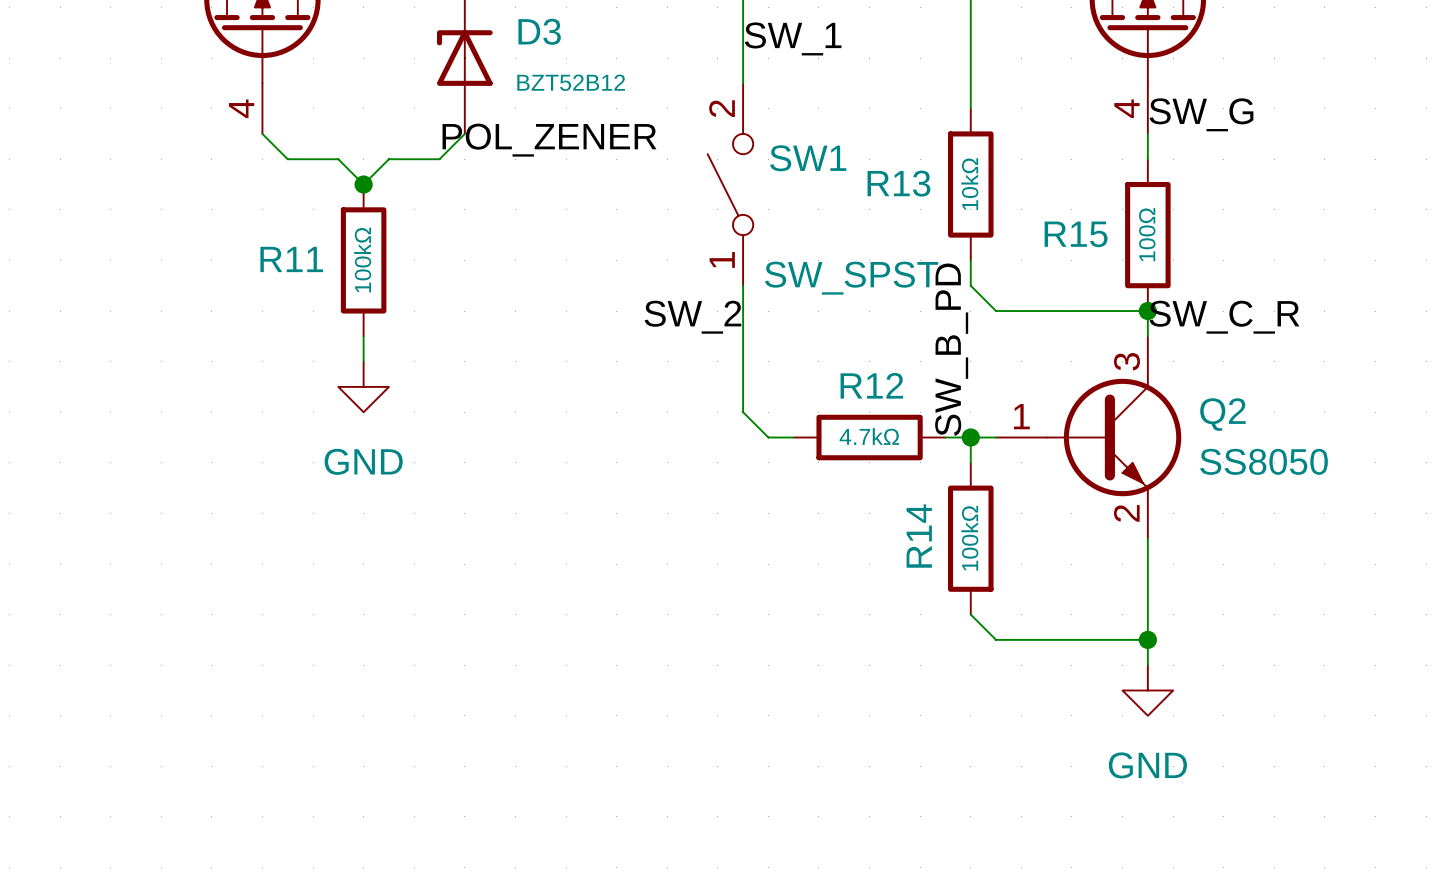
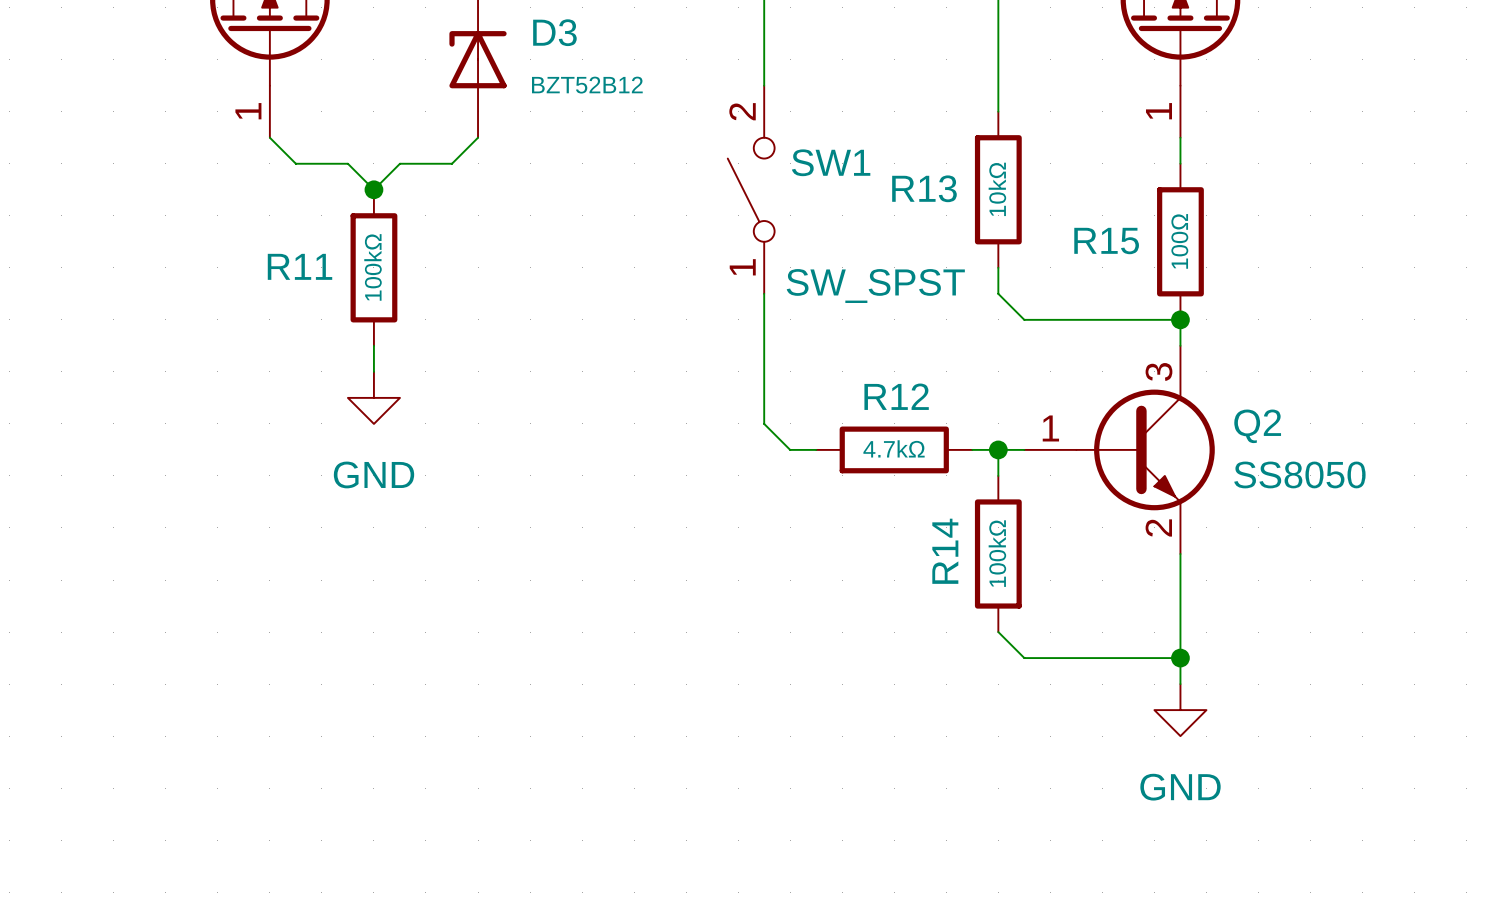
label: SW_1 (793, 38) -> none
part pin number: 4 (241, 108) -> 1 (248, 111)
part pin number: 4 (1126, 108) -> 1 (1158, 111)
label: SW_G (1201, 114) -> none
label: POL_ZENER (549, 140) -> none
label: SW_2 (692, 317) -> none
label: SW_C_R (1224, 317) -> none
label: SW_B_PD (951, 349) -> none

